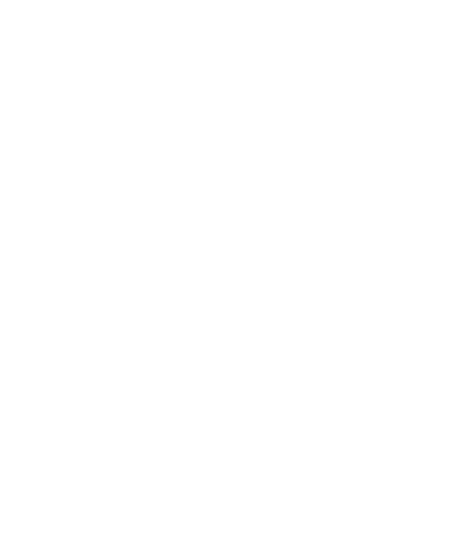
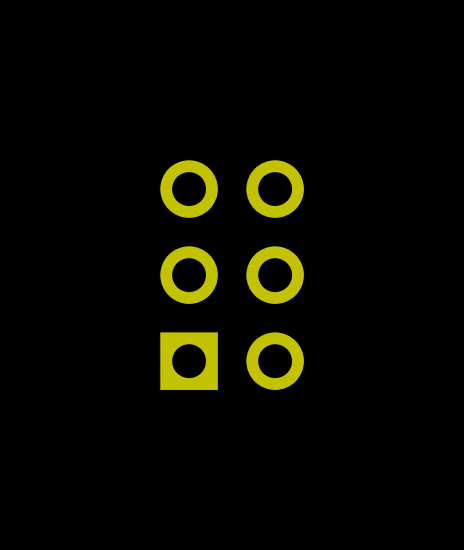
part: none -> (232, 275)

